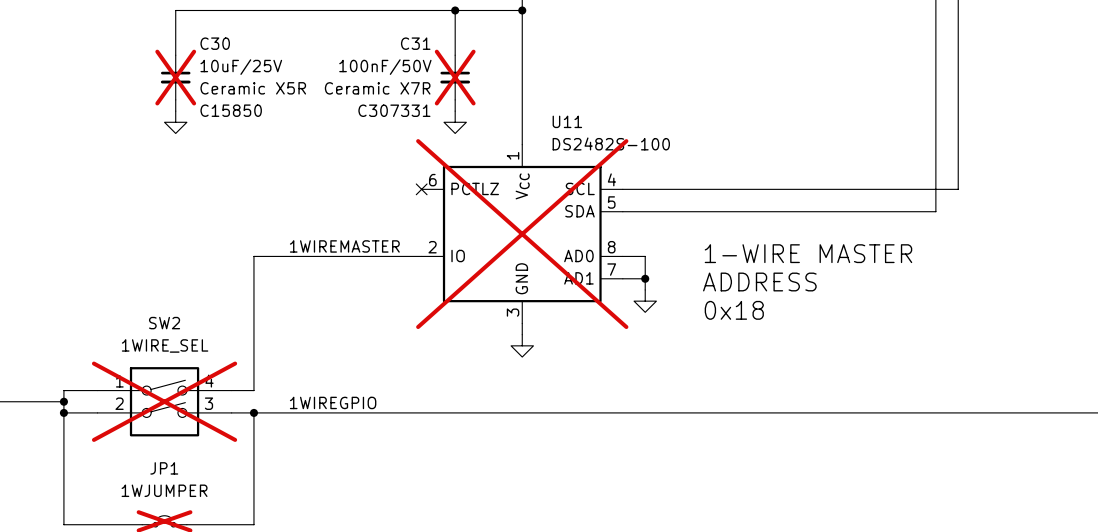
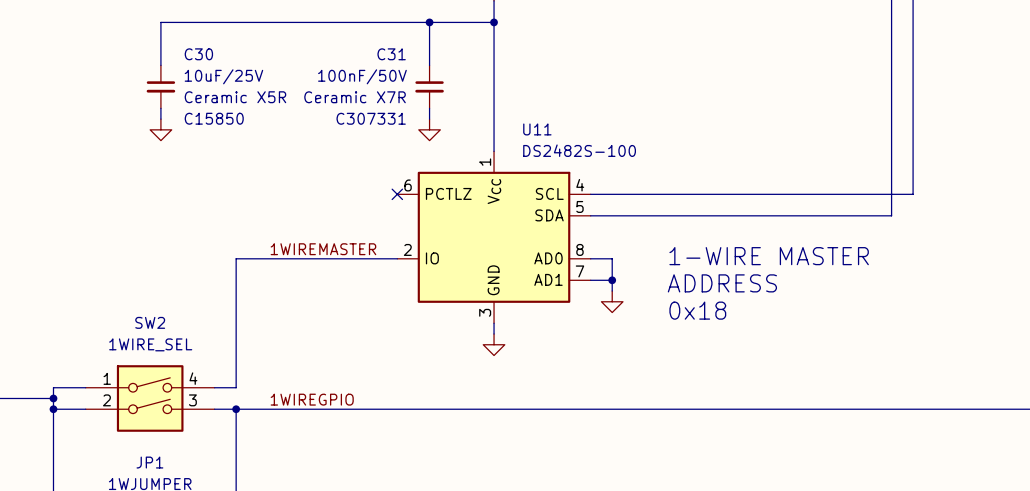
C30 do-not-place cross: (175, 77) -> none
C31 do-not-place cross: (455, 77) -> none
U11 do-not-place cross: (522, 234) -> none
SW2 do-not-place cross: (164, 401) -> none

